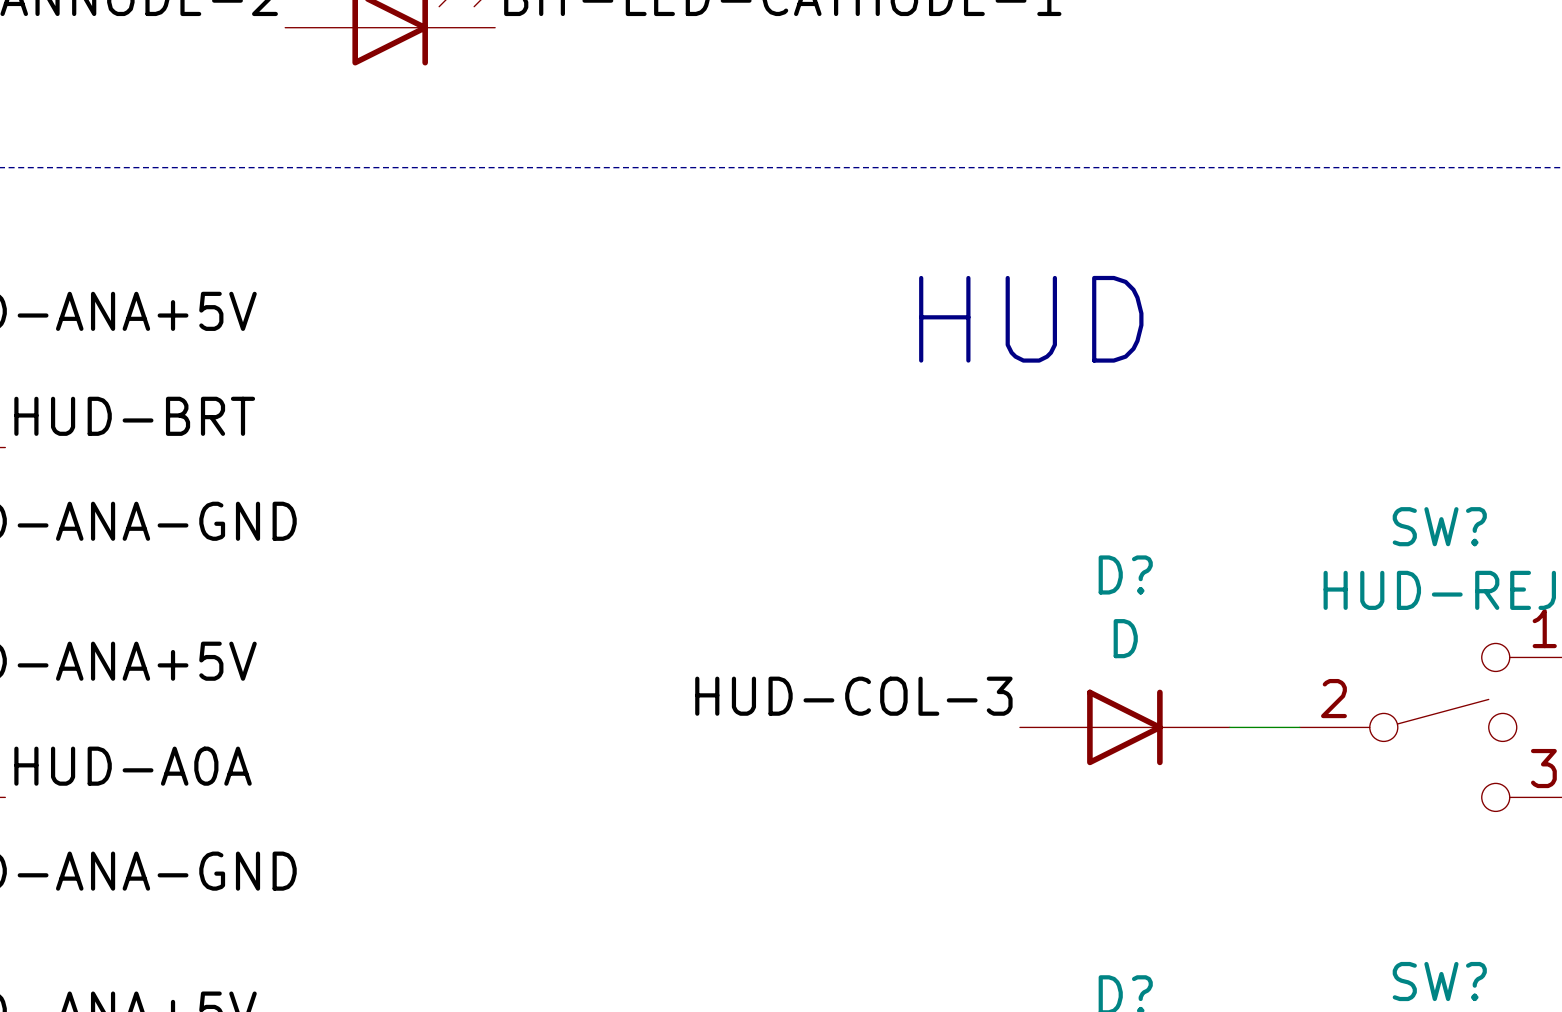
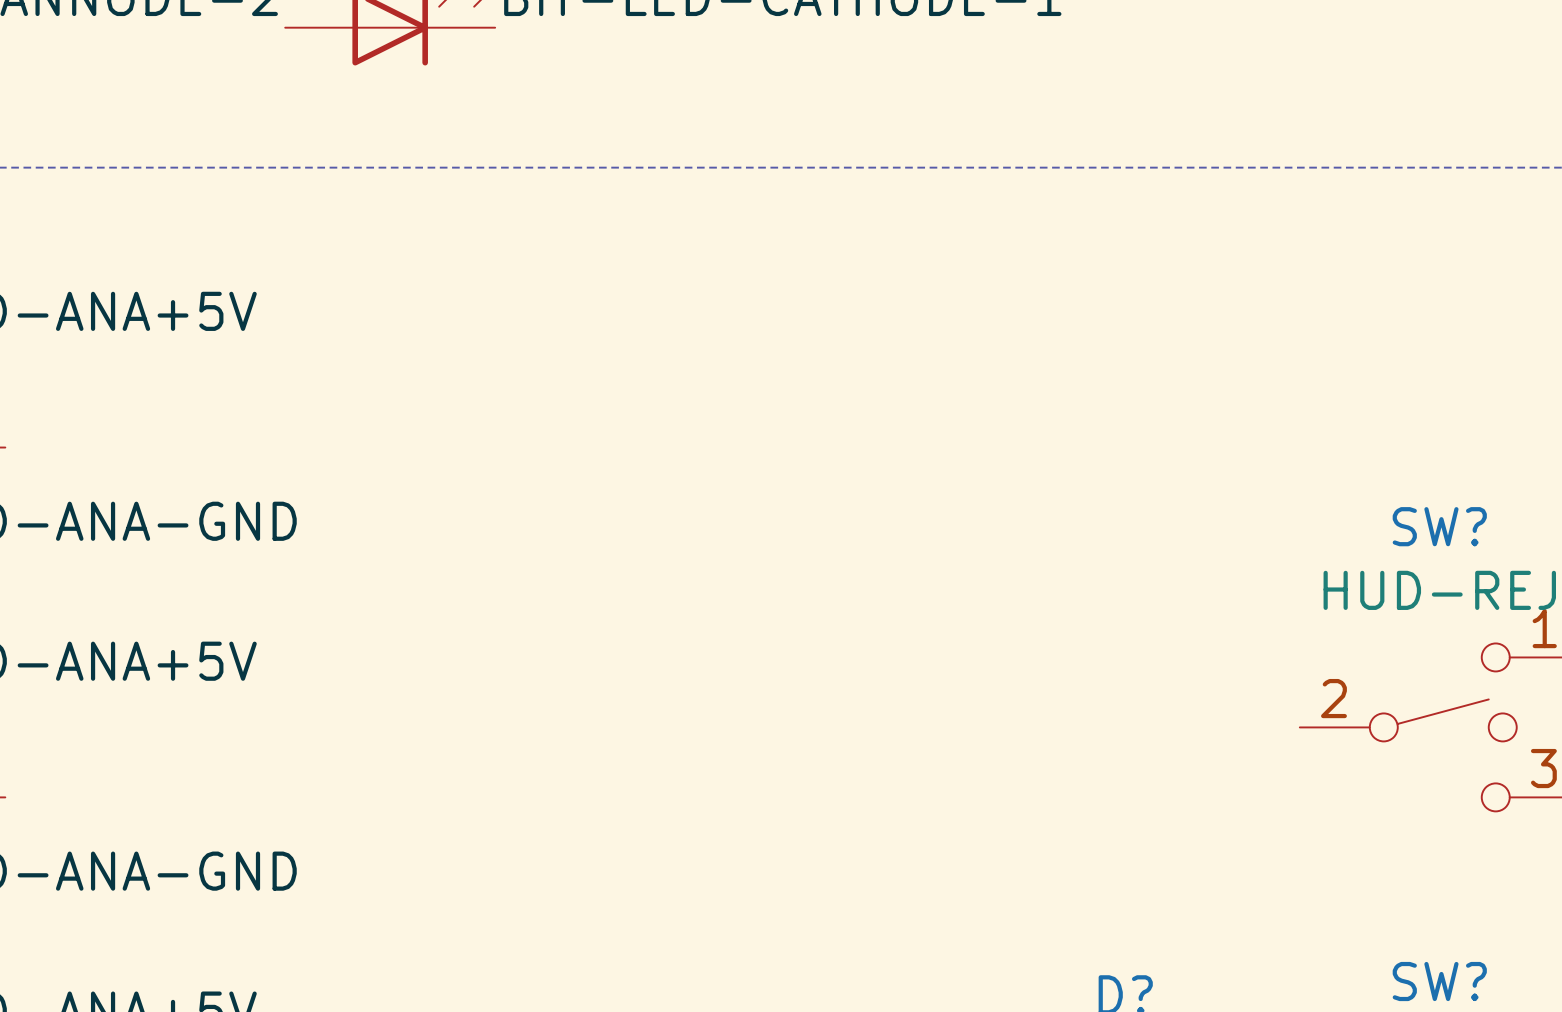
text: HUD (1031, 319) -> none
label: HUD-BRT (134, 416) -> none
label: HUD-COL-3 (853, 696) -> none
D?: D (1124, 727) -> none
wire: (1229, 727) (1299, 727) -> none
label: HUD-A0A (133, 766) -> none

